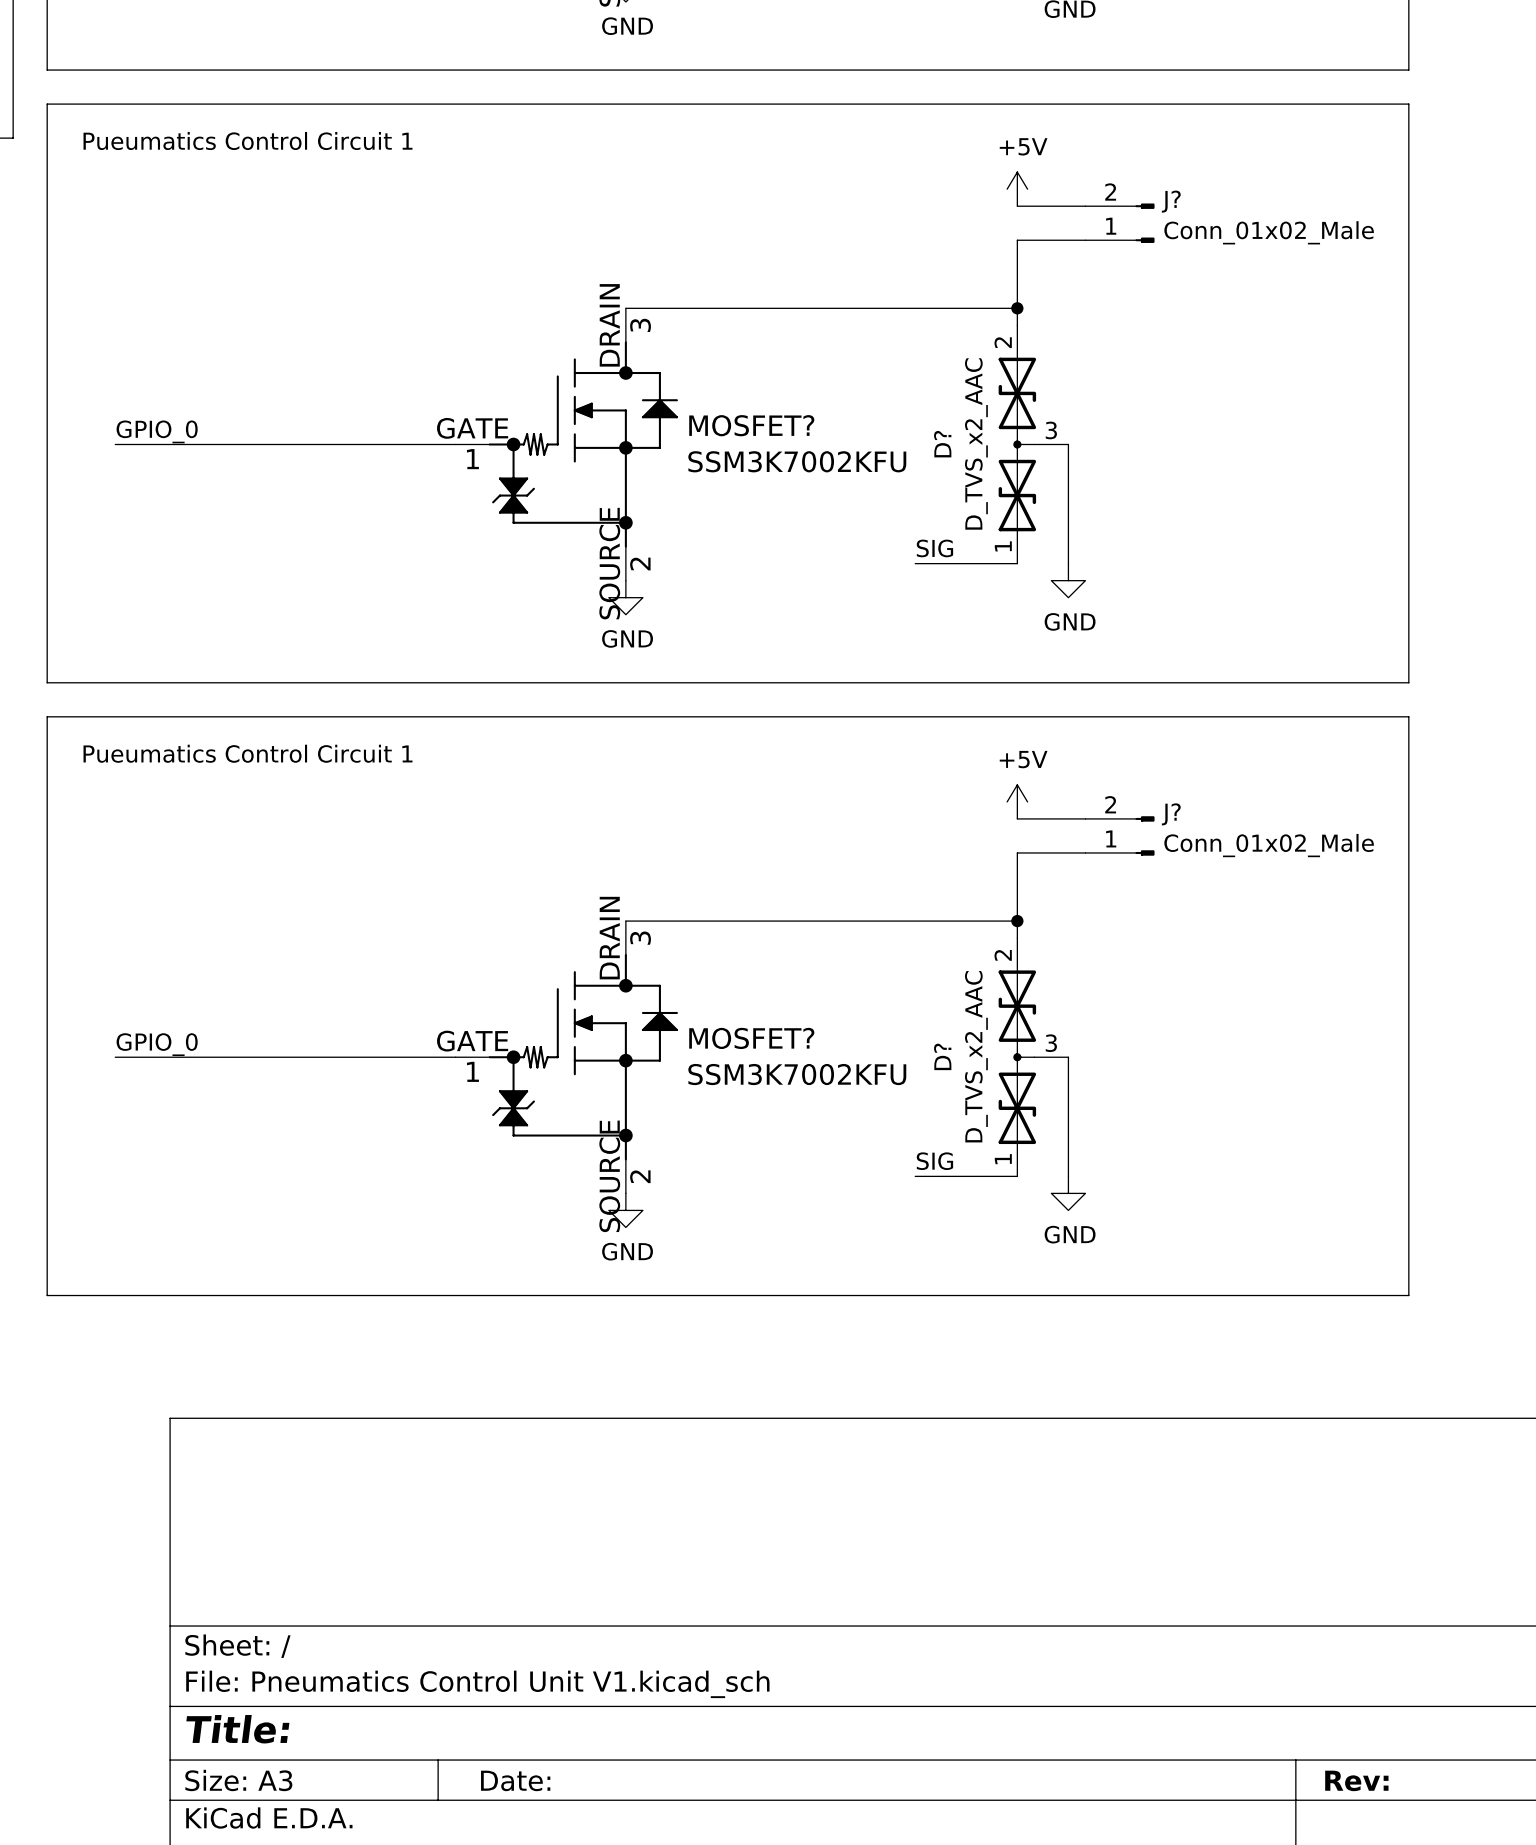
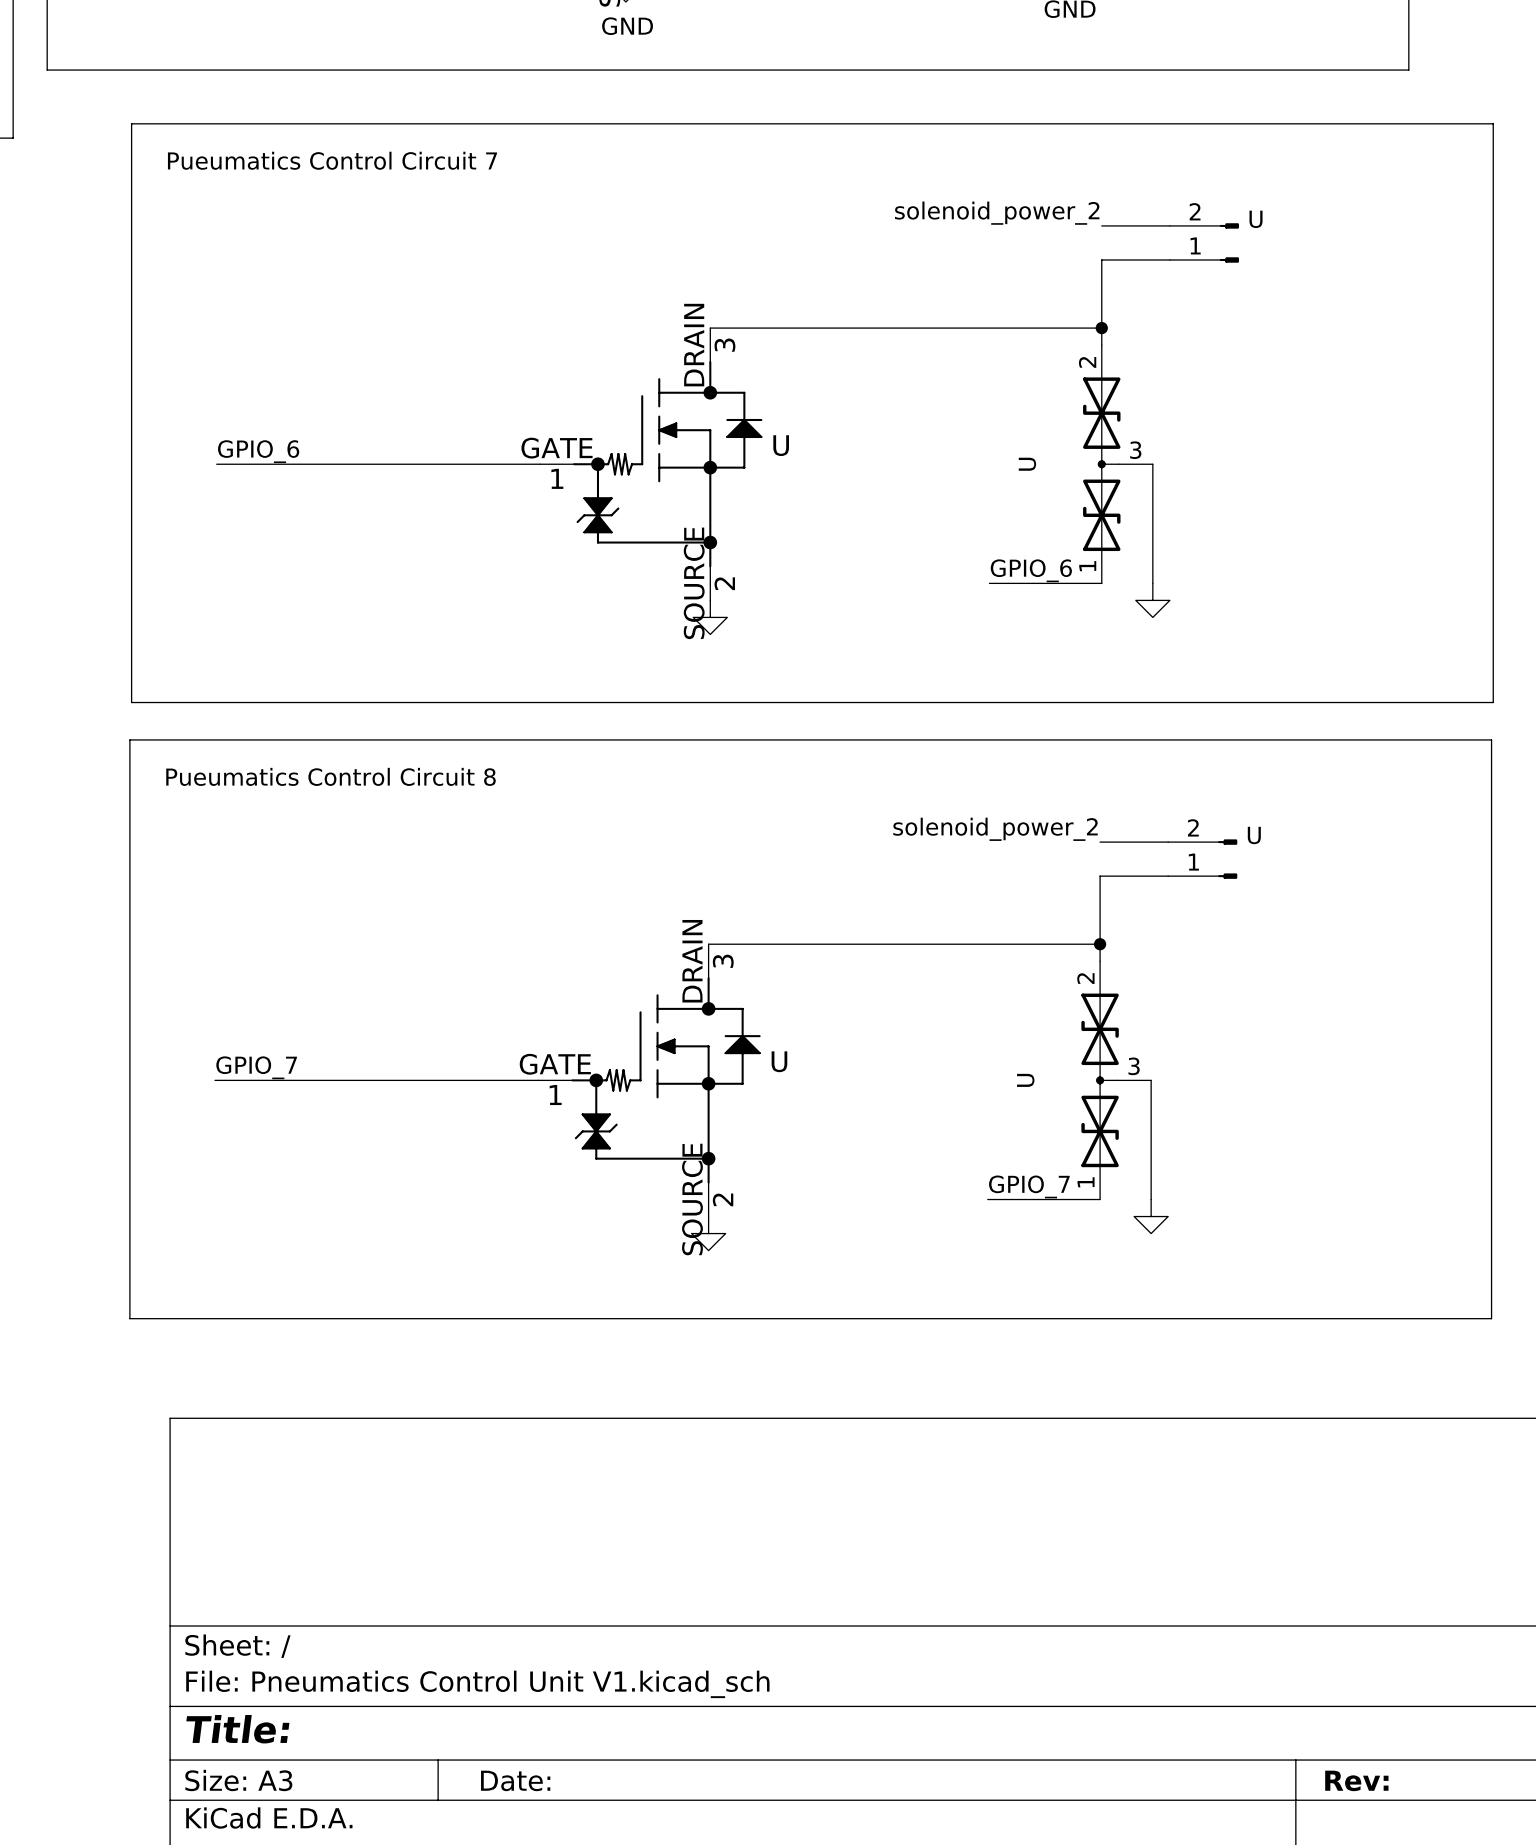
line: (47, 104) (47, 682) (1408, 682) (1408, 104) (47, 104) -> (131, 123) (131, 702) (1493, 702) (1493, 123) (131, 123)
text: Pueumatics Control Circuit 1 (247, 141) -> Pueumatics Control Circuit 7 (332, 160)
power symbol: +5V (1017, 189) -> none
wire: (1017, 206) (1085, 206) -> (1101, 225) (1169, 225)
label: none -> solenoid_power_2 (997, 213)
J?: Conn_01x02_Male (1119, 223) -> none
wire: (1085, 240) (1017, 240) (1017, 325) -> (1169, 259) (1101, 259) (1101, 345)
U: none -> (1204, 242)
wire: (625, 308) (1017, 308) -> (710, 328) (1101, 328)
junction: (1017, 308) -> none
junction: none -> (1101, 328)
label: GPIO_0 (157, 431) -> GPIO_6 (258, 451)
wire: (115, 444) (455, 444) -> none
MOSFET?: SSM3K7002KFU (566, 444) -> none
D?: D_TVS_x2_AAC (1033, 444) -> none
wire: (1068, 444) (1068, 563) -> (1152, 464) (1152, 583)
wire: none -> (216, 464) (540, 464)
U: none -> (651, 464)
U: none -> (1117, 464)
label: SIG (934, 548) -> none
wire: (915, 563) (1017, 563) -> none
label: none -> GPIO_6 (1031, 570)
power symbol: GND (1068, 580) -> none
wire: none -> (989, 583) (1101, 583)
power symbol: GND (625, 597) -> none
power symbol: none -> (1152, 600)
power symbol: none -> (710, 617)
line: (47, 716) (47, 1295) (1408, 1295) (1408, 716) (47, 716) -> (129, 739) (129, 1318) (1491, 1318) (1491, 739) (129, 739)
text: Pueumatics Control Circuit 1 (247, 753) -> Pueumatics Control Circuit 8 (330, 776)
power symbol: +5V (1017, 801) -> none
wire: (1017, 818) (1085, 818) -> (1100, 842) (1168, 842)
label: none -> solenoid_power_2 (995, 829)
J?: Conn_01x02_Male (1119, 835) -> none
wire: (1085, 852) (1017, 852) (1017, 938) -> (1168, 876) (1100, 876) (1100, 961)
U: none -> (1202, 859)
wire: (625, 921) (1017, 921) -> (708, 944) (1100, 944)
junction: (1017, 921) -> none
junction: none -> (1100, 944)
label: GPIO_0 (157, 1044) -> GPIO_7 (256, 1067)
wire: (115, 1057) (455, 1057) -> none
MOSFET?: SSM3K7002KFU (566, 1057) -> none
D?: D_TVS_x2_AAC (1033, 1057) -> none
wire: (1068, 1057) (1068, 1176) -> (1151, 1080) (1151, 1199)
wire: none -> (215, 1080) (538, 1080)
U: none -> (649, 1080)
U: none -> (1116, 1080)
label: SIG (934, 1161) -> none
wire: (915, 1176) (1017, 1176) -> none
label: none -> GPIO_7 (1029, 1186)
power symbol: GND (1068, 1193) -> none
wire: none -> (987, 1199) (1100, 1199)
power symbol: GND (625, 1210) -> none
power symbol: none -> (1151, 1216)
power symbol: none -> (708, 1233)

